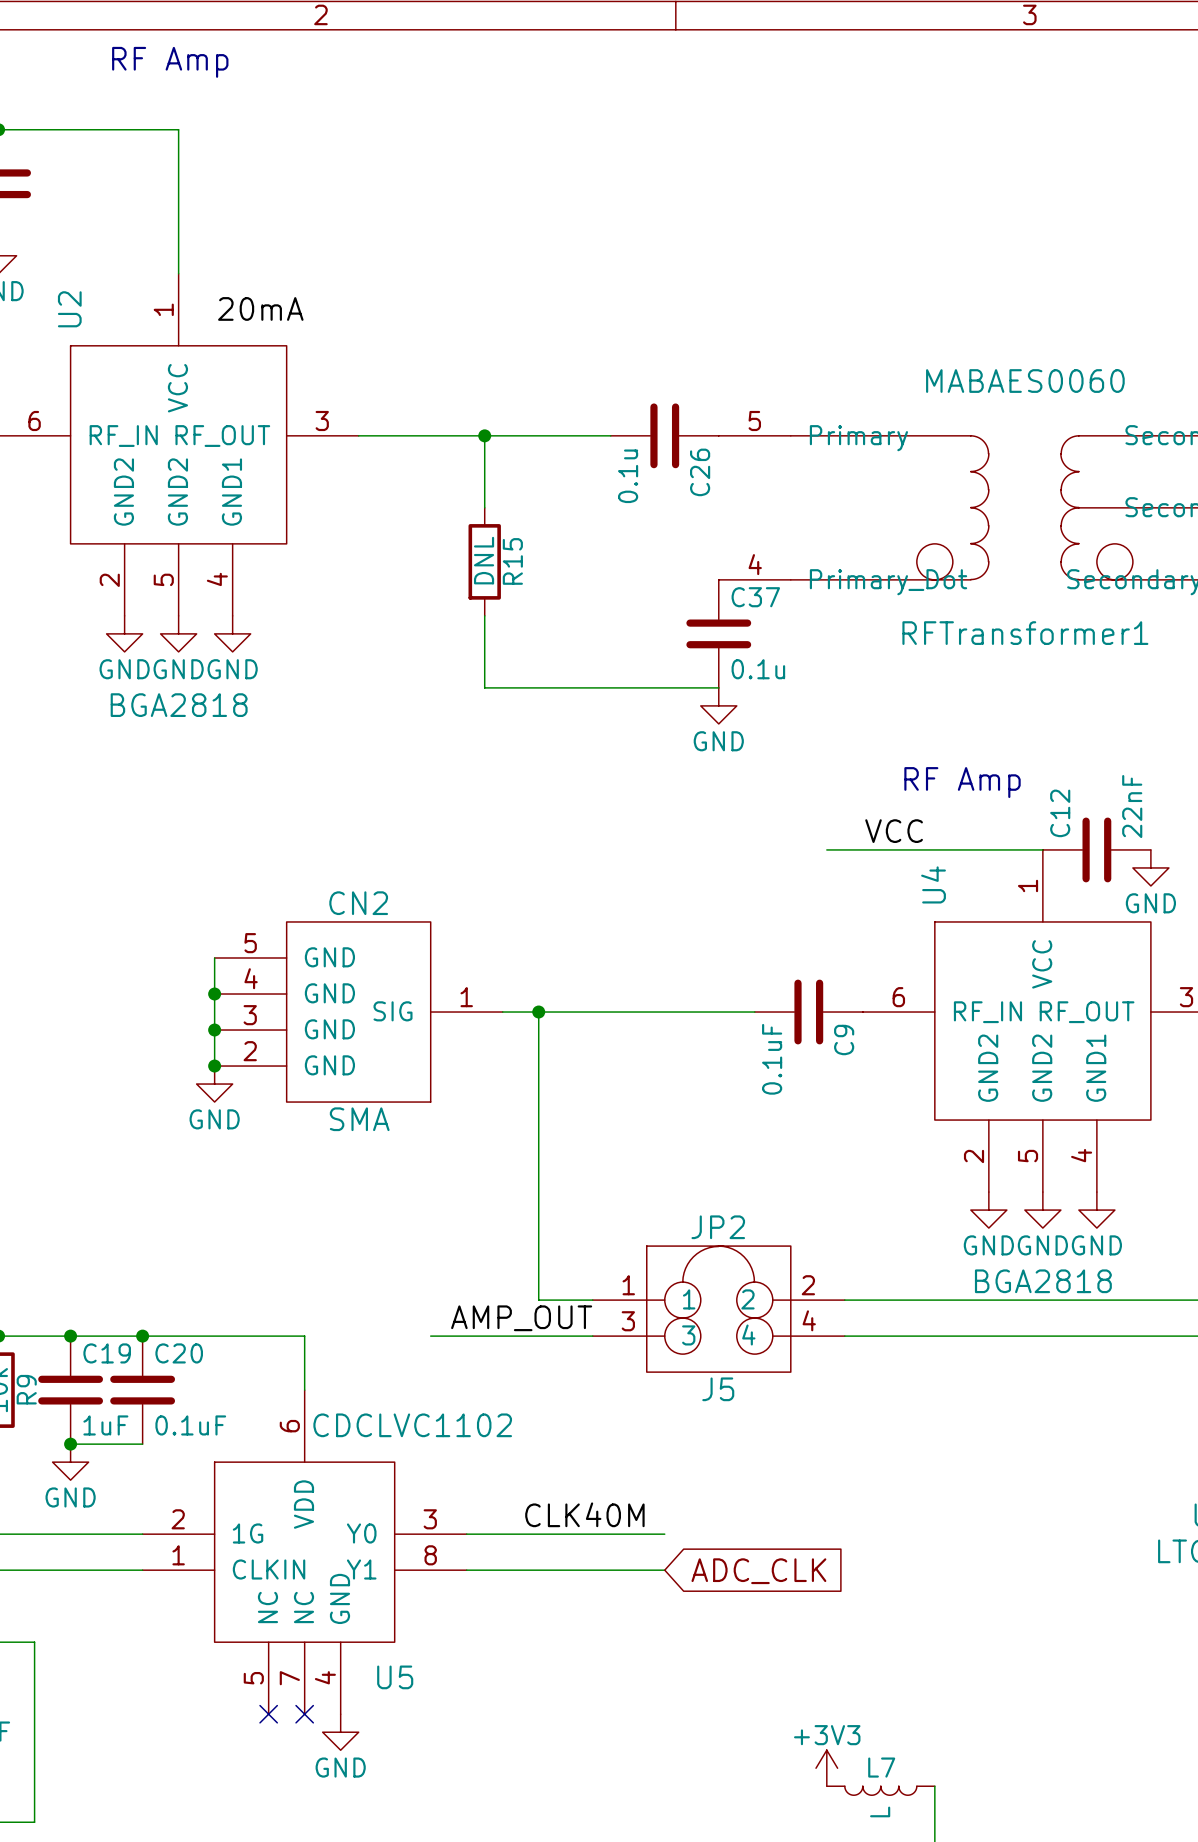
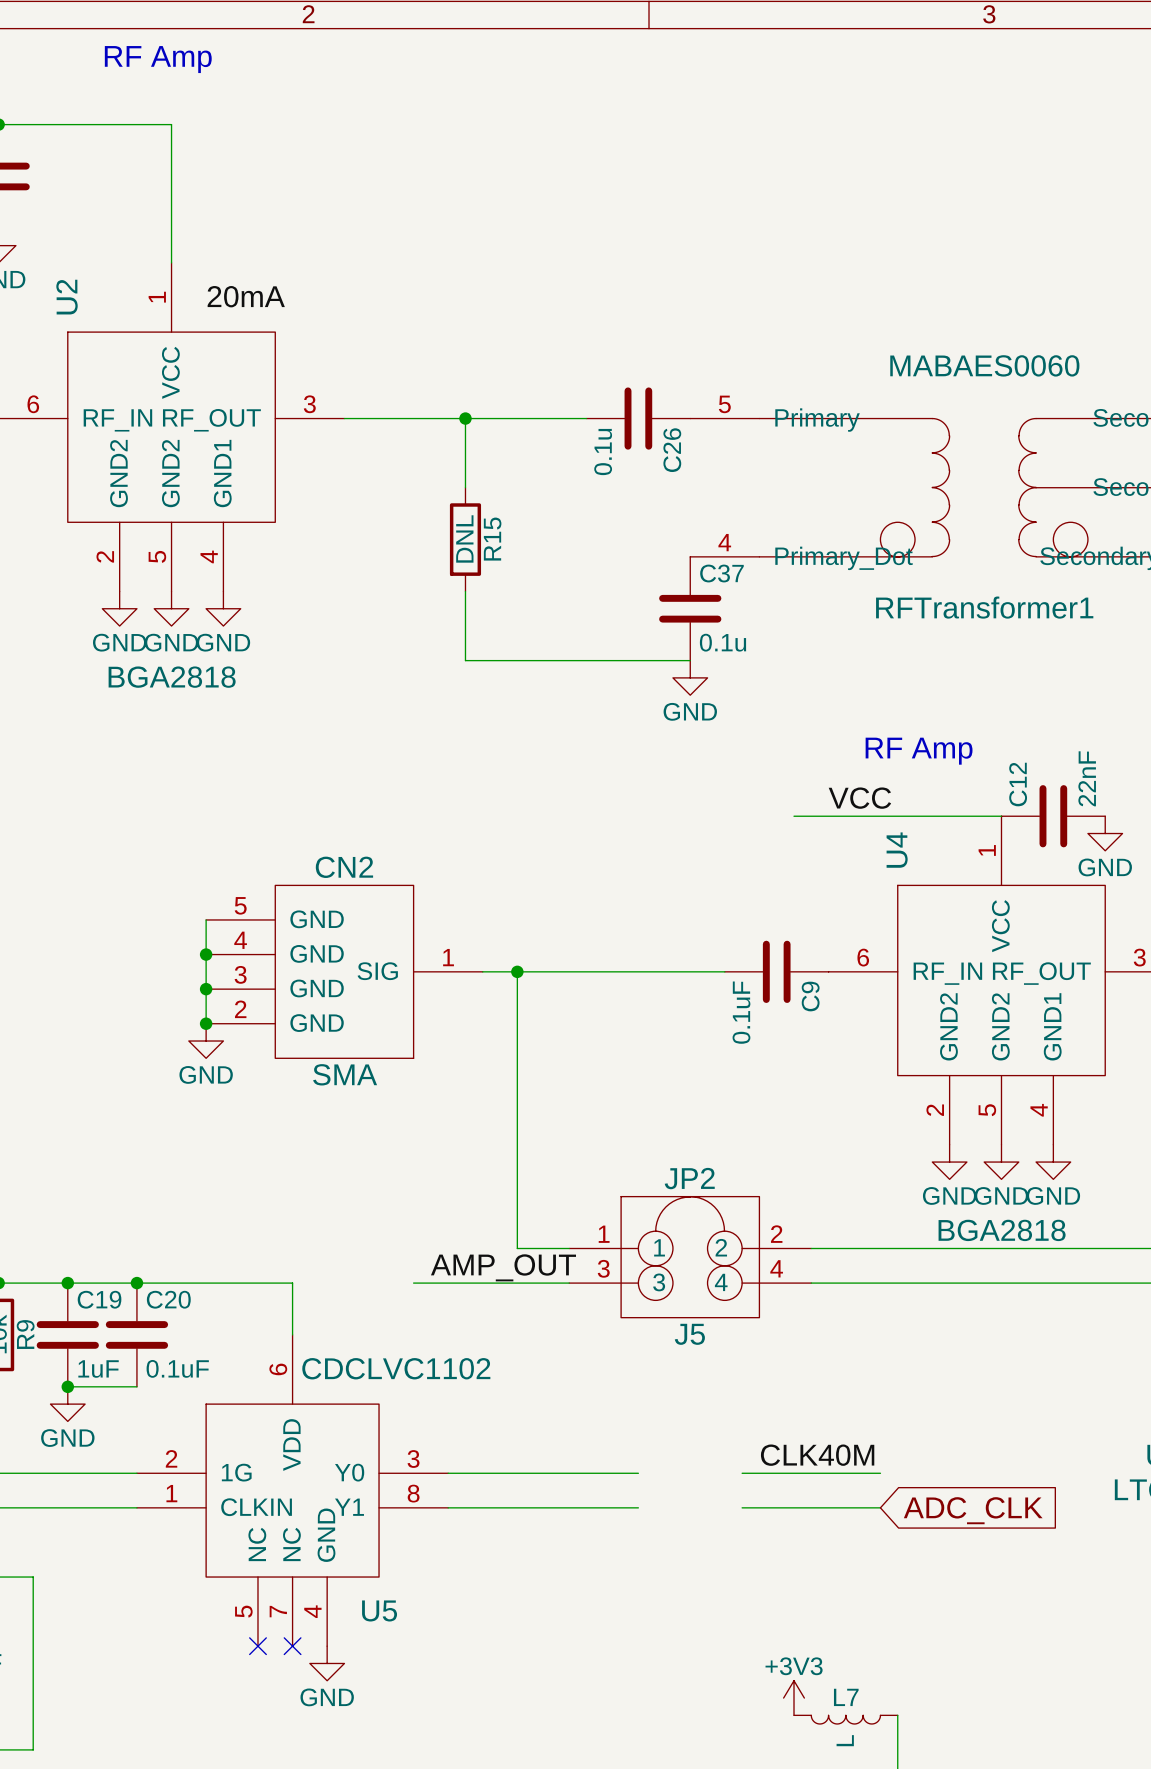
label position: CLK40M (584, 1514) -> CLK40M (817, 1455)
wire: none -> (742, 1473) (880, 1473)
wire: none -> (742, 1507) (880, 1507)
global label position: ADC_CLK (758, 1571) -> ADC_CLK (973, 1510)

